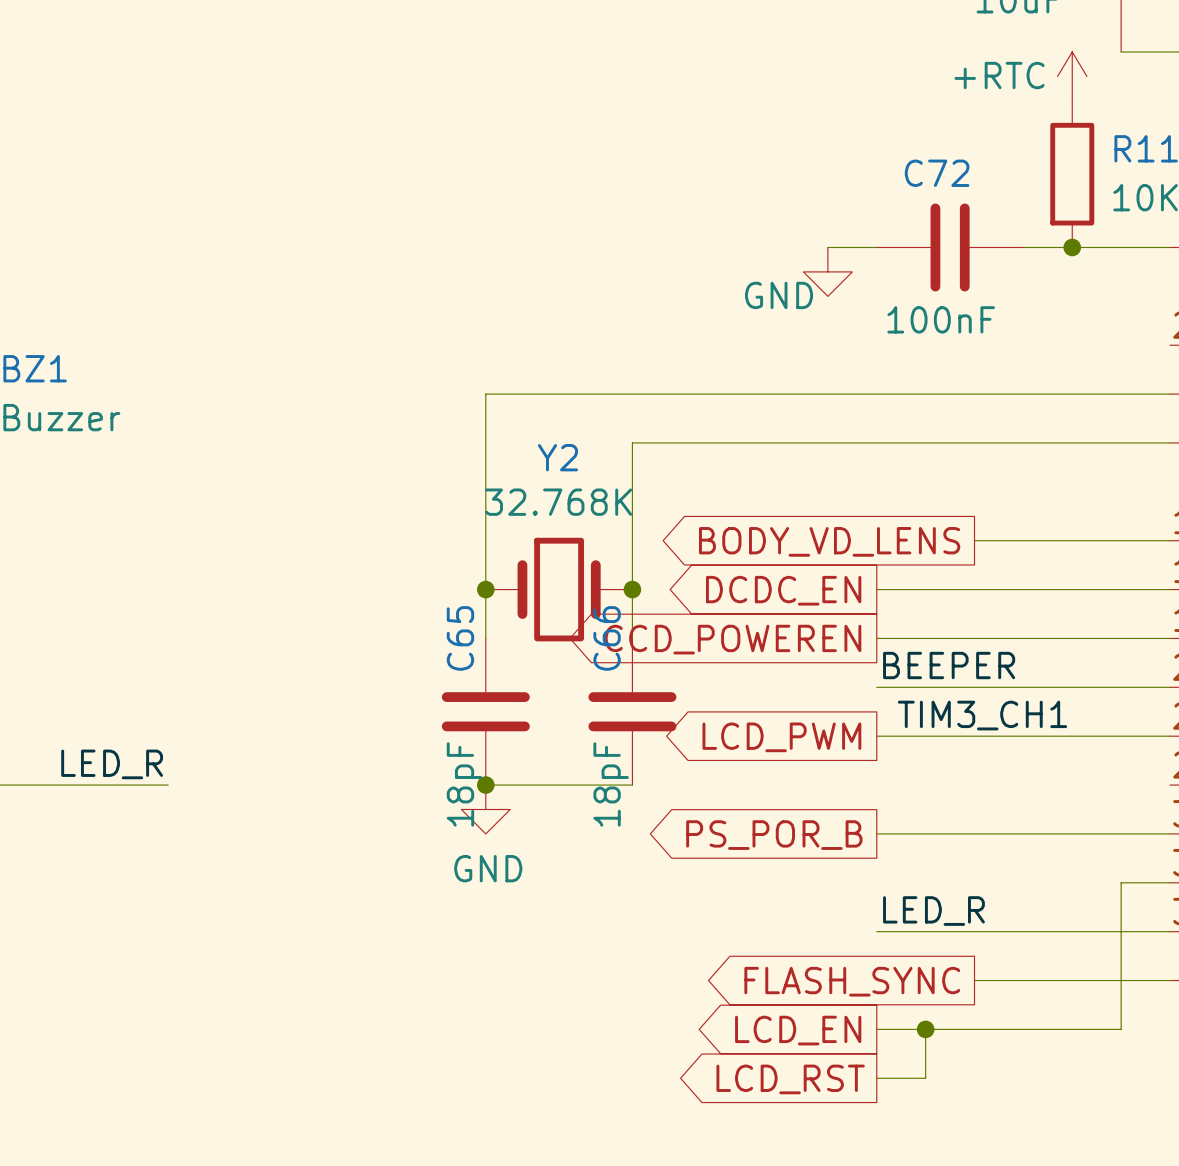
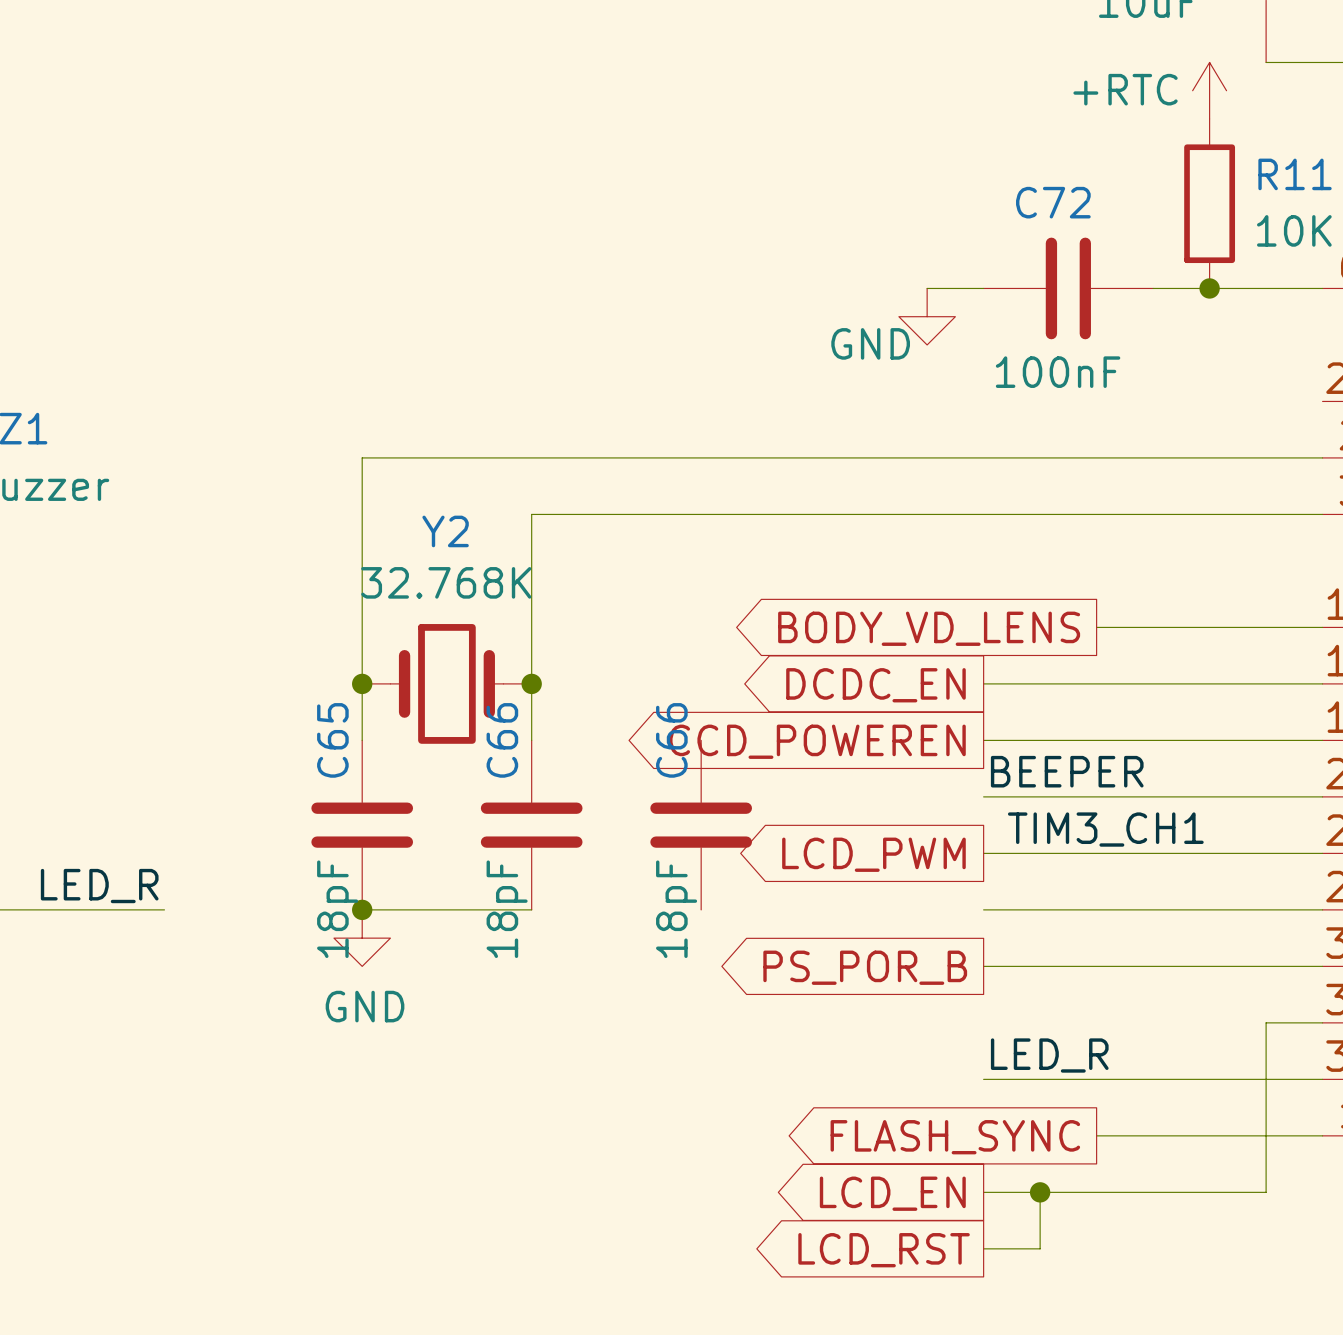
wire: (485, 394) (485, 442) -> (701, 514) (531, 514)
wire: none -> (531, 457) (362, 457) (362, 740)
wire: (632, 442) (632, 638) -> none
junction: none -> (362, 683)
Y2 position: (559, 589) -> (446, 683)
junction: (632, 589) -> none
C65 name: C65 (460, 638) -> C66 (502, 740)
C65: none -> 18pF (362, 825)
junction: none -> (362, 909)
wire: (485, 785) (632, 785) -> (531, 909) (362, 909)
junction: (485, 785) -> none
wire: none -> (983, 909) (1322, 909)
power symbol position: GND (485, 809) -> GND (362, 938)

